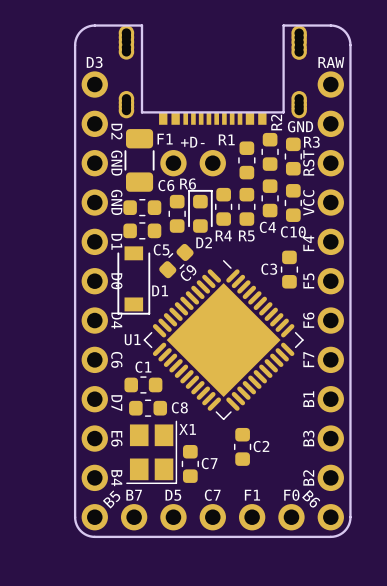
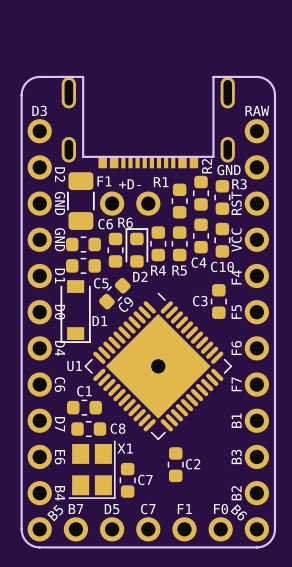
part footprint: [118, 25, 307, 125] -> [61, 77, 235, 169]
U1 footprint: [143, 260, 304, 420] -> [84, 292, 232, 440]

